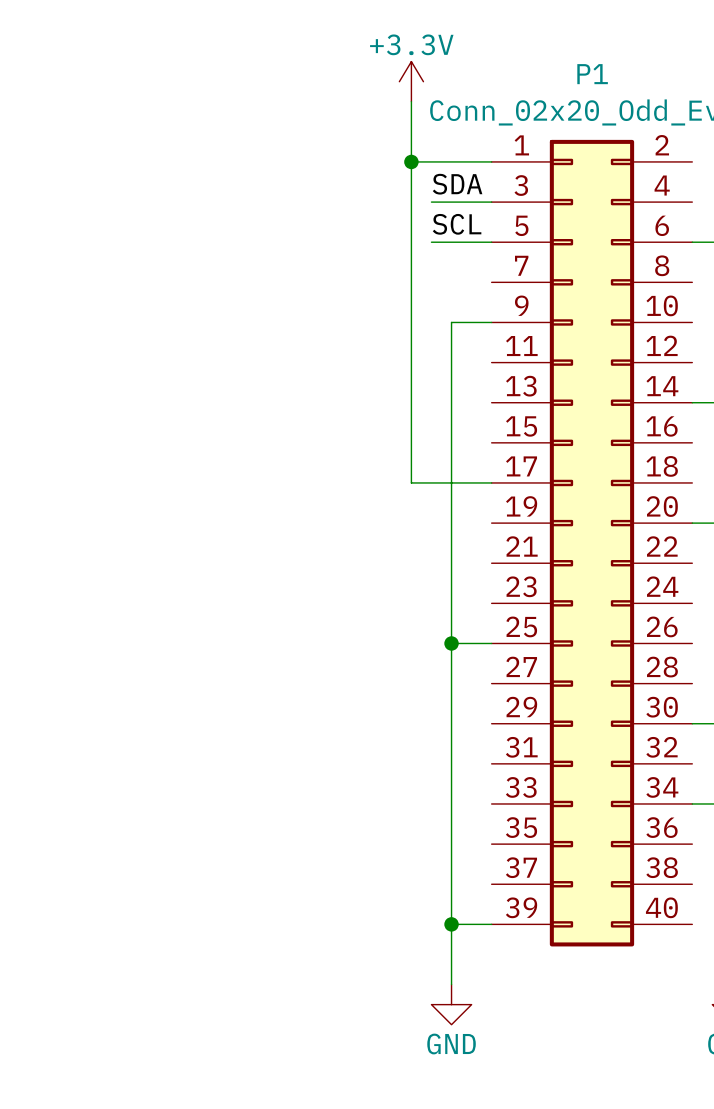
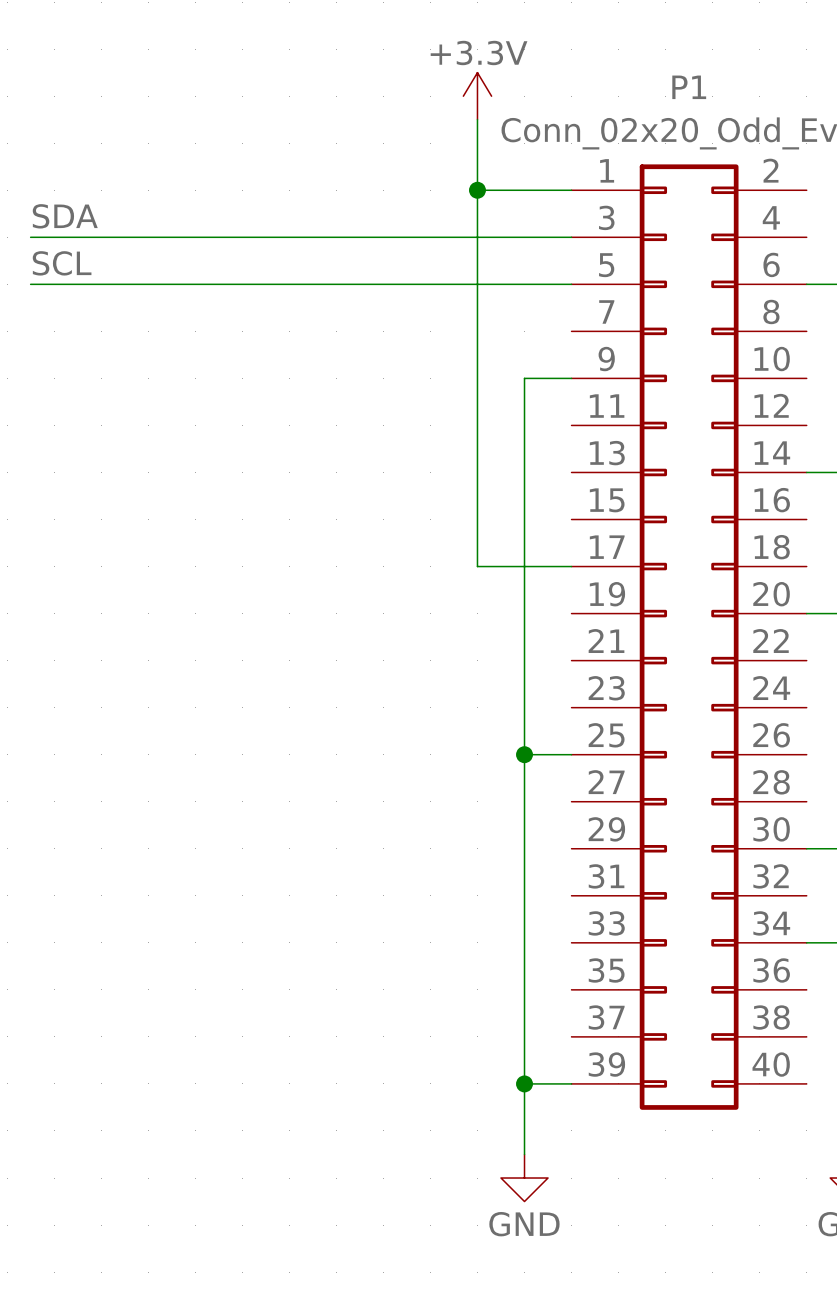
label: none -> SDA (65, 216)
label: SDA (457, 184) -> none
wire: none -> (30, 237) (500, 237)
label: none -> SCL (62, 263)
label: SCL (457, 224) -> none
wire: none -> (30, 284) (500, 284)

